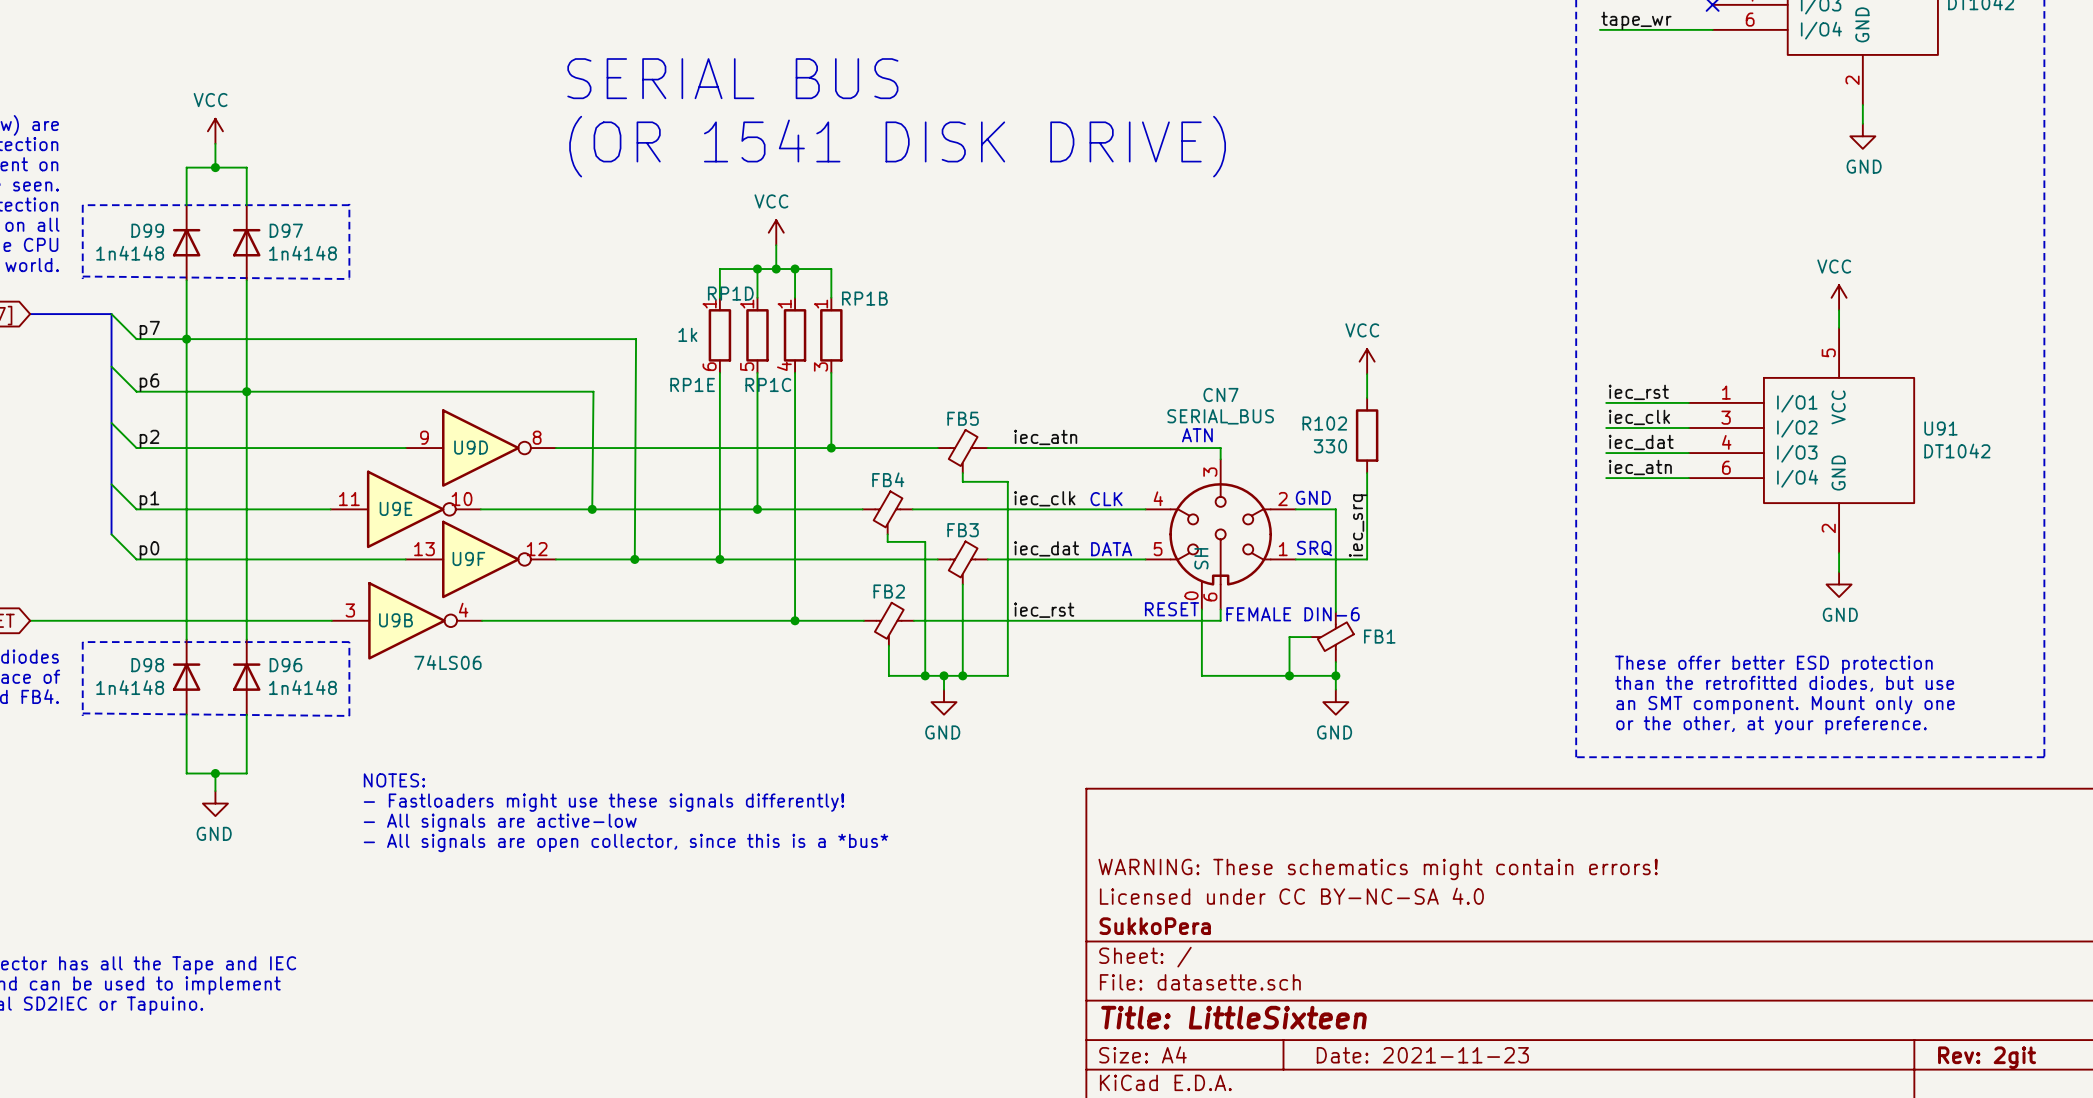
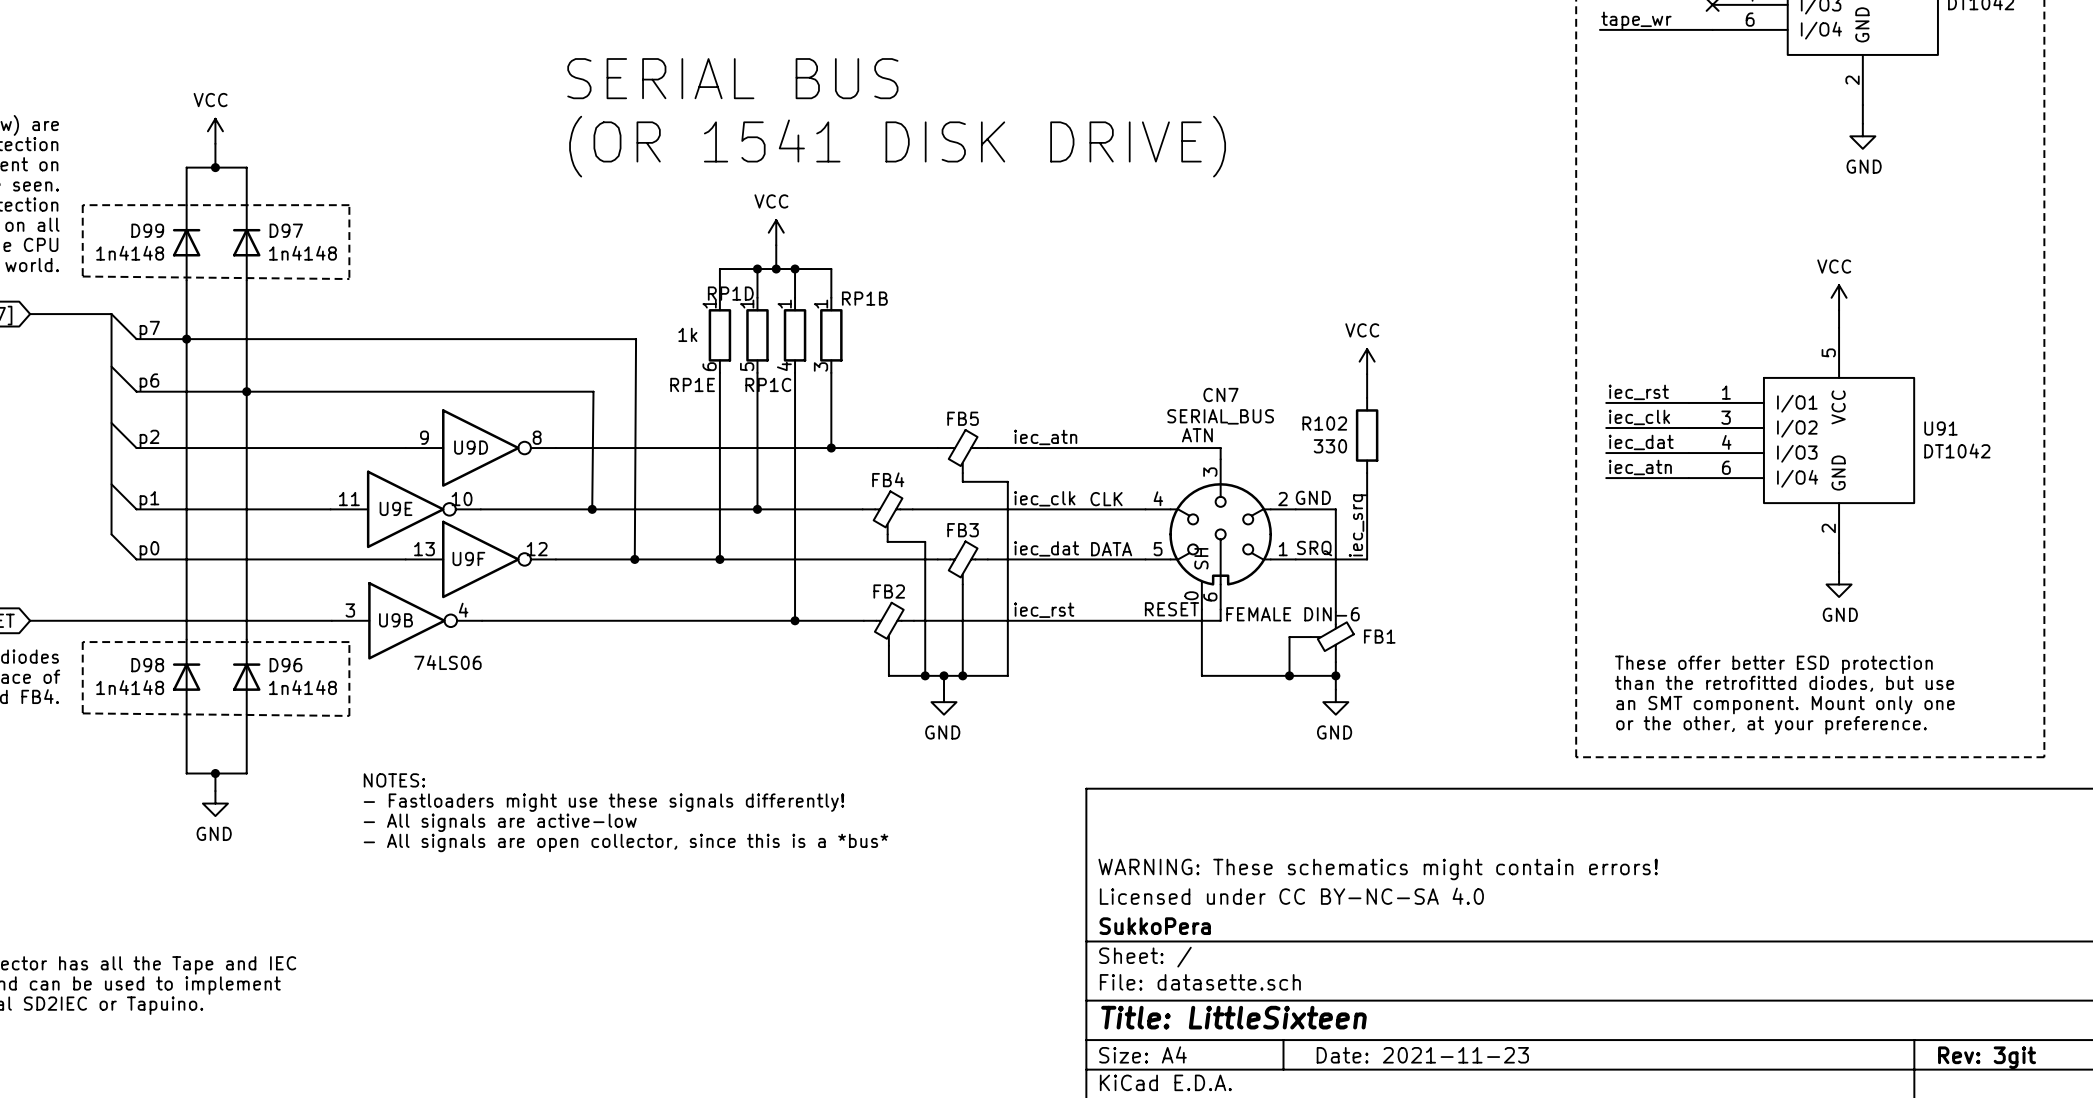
title block: Rev: 2git (1987, 1057) -> Rev: 3git (1987, 1057)

